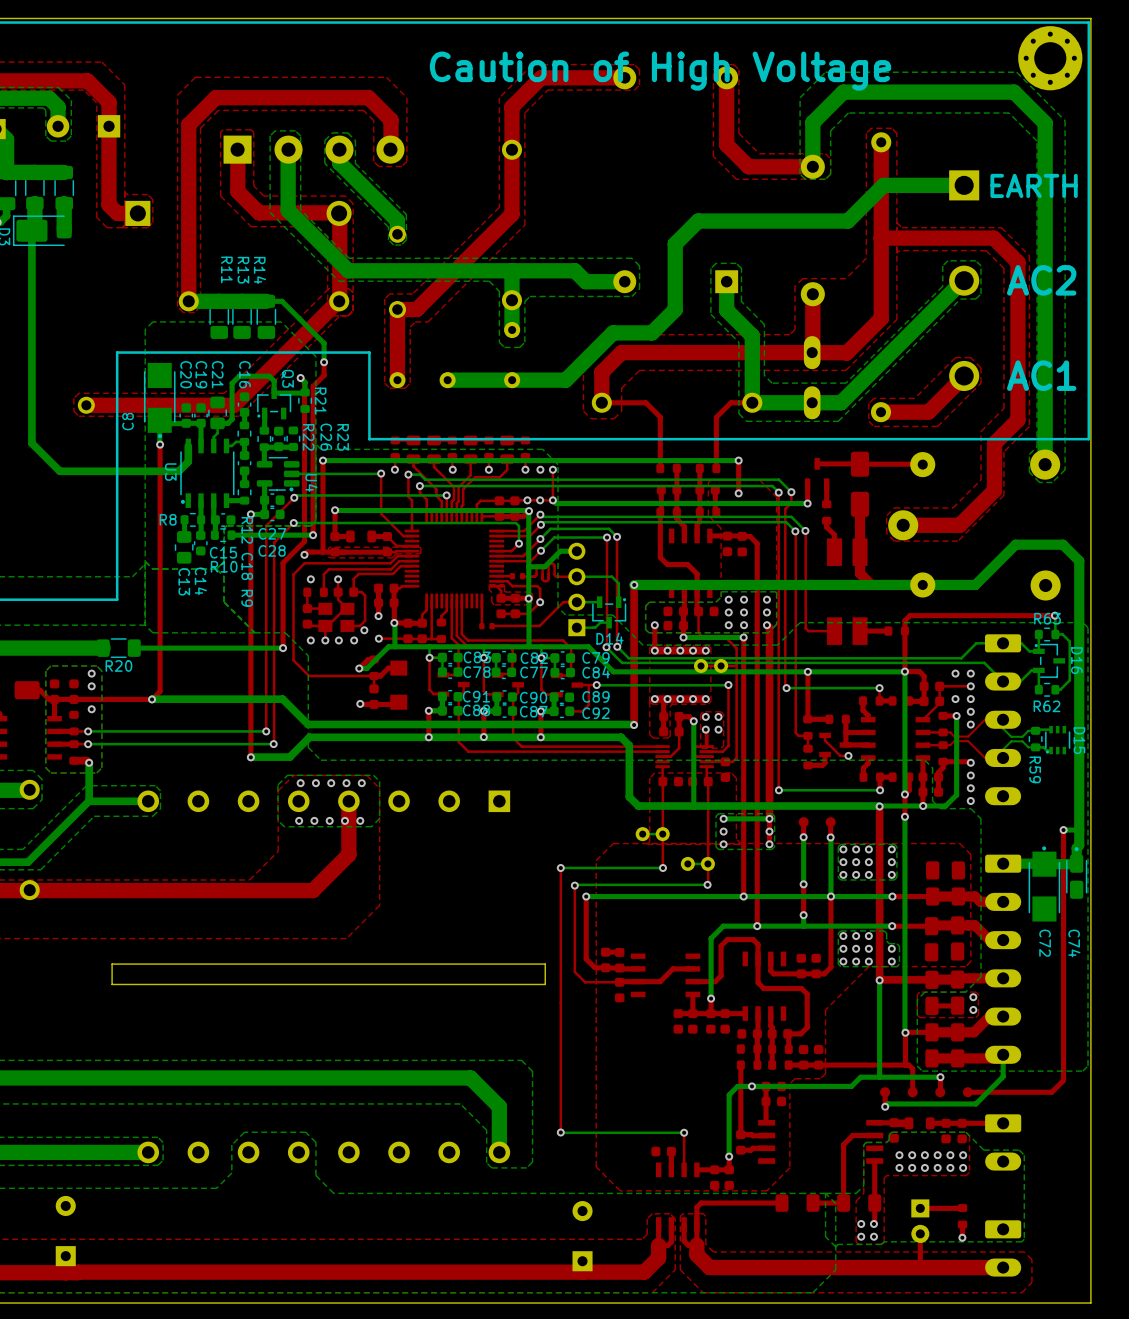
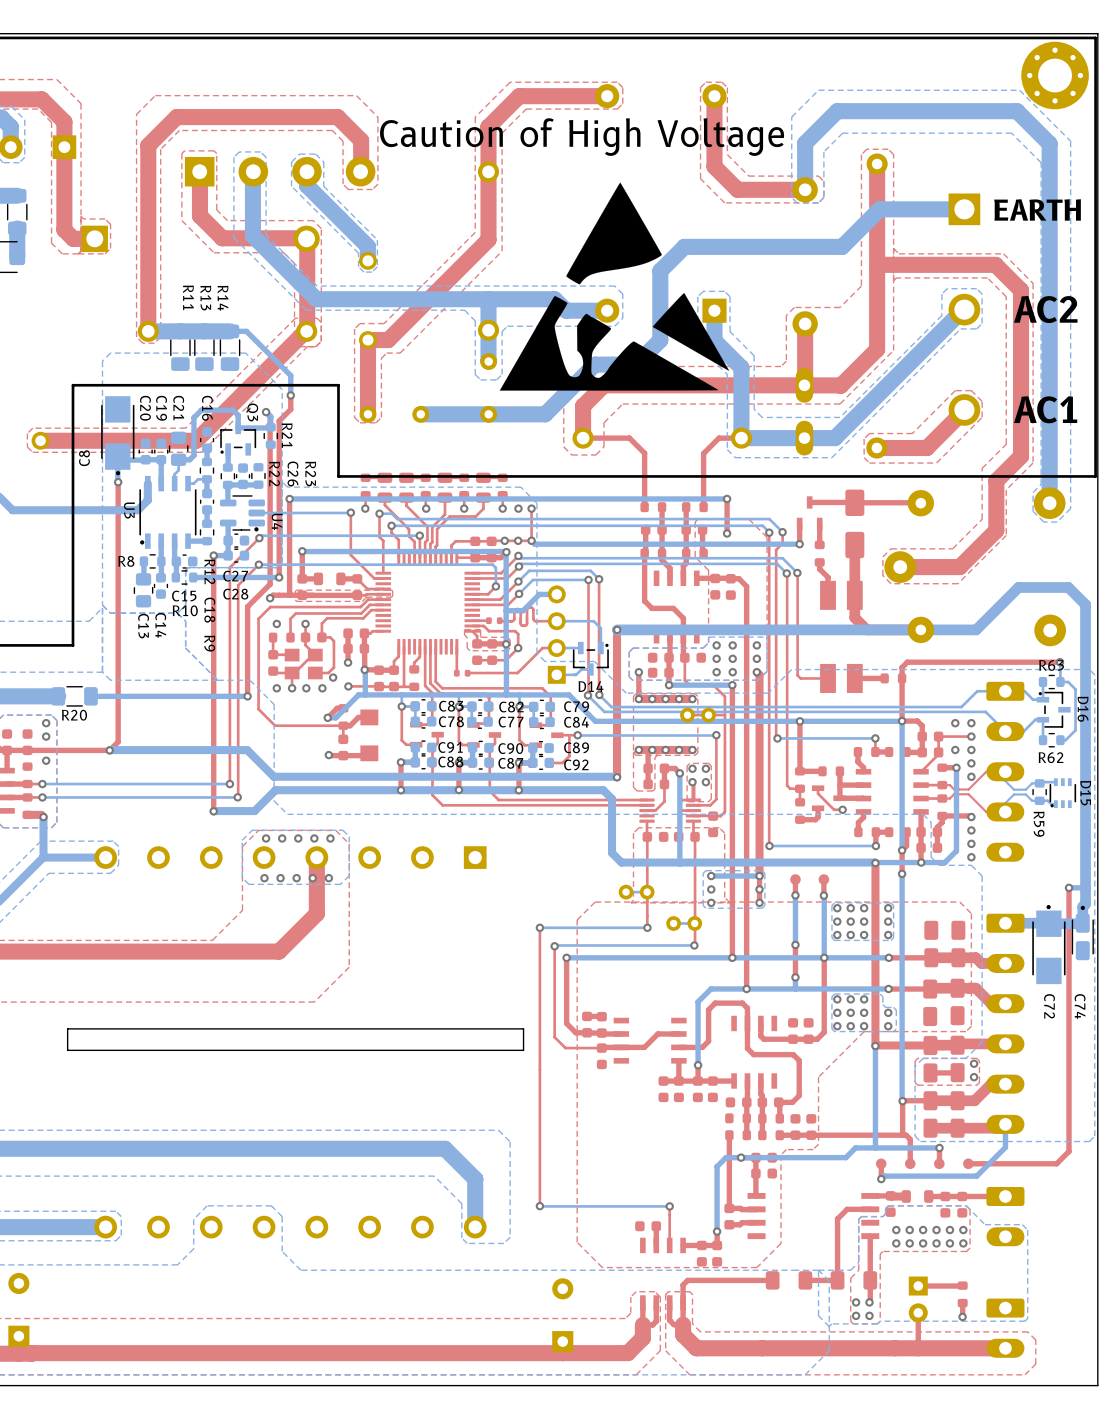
text position: Caution of High Voltage (660, 71) -> Caution of High Voltage (582, 137)
drawing: none -> [499, 182, 730, 391]

